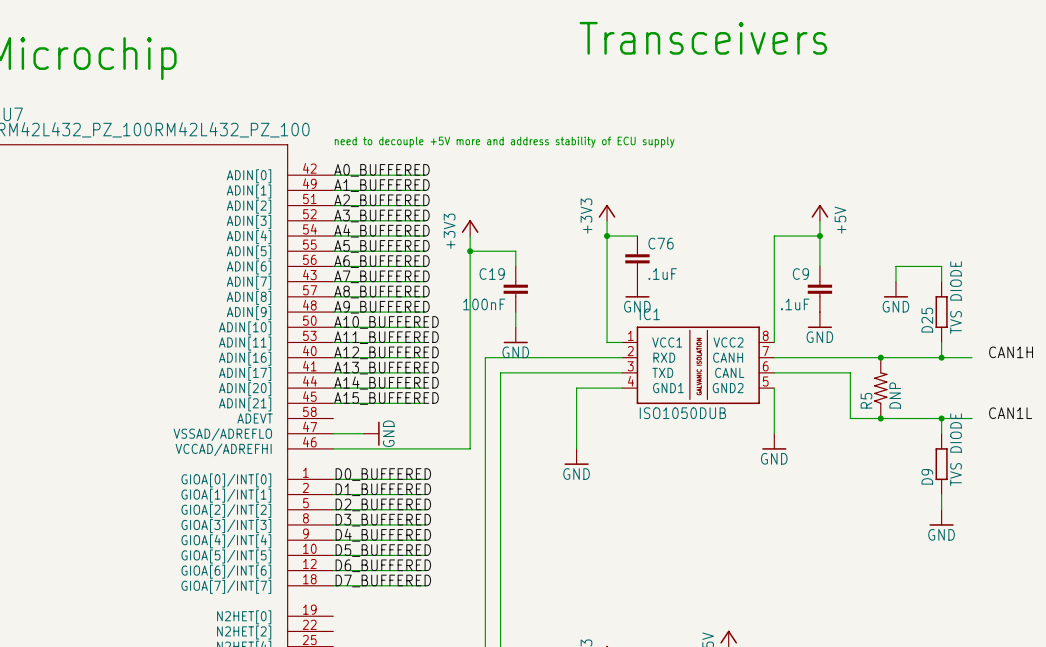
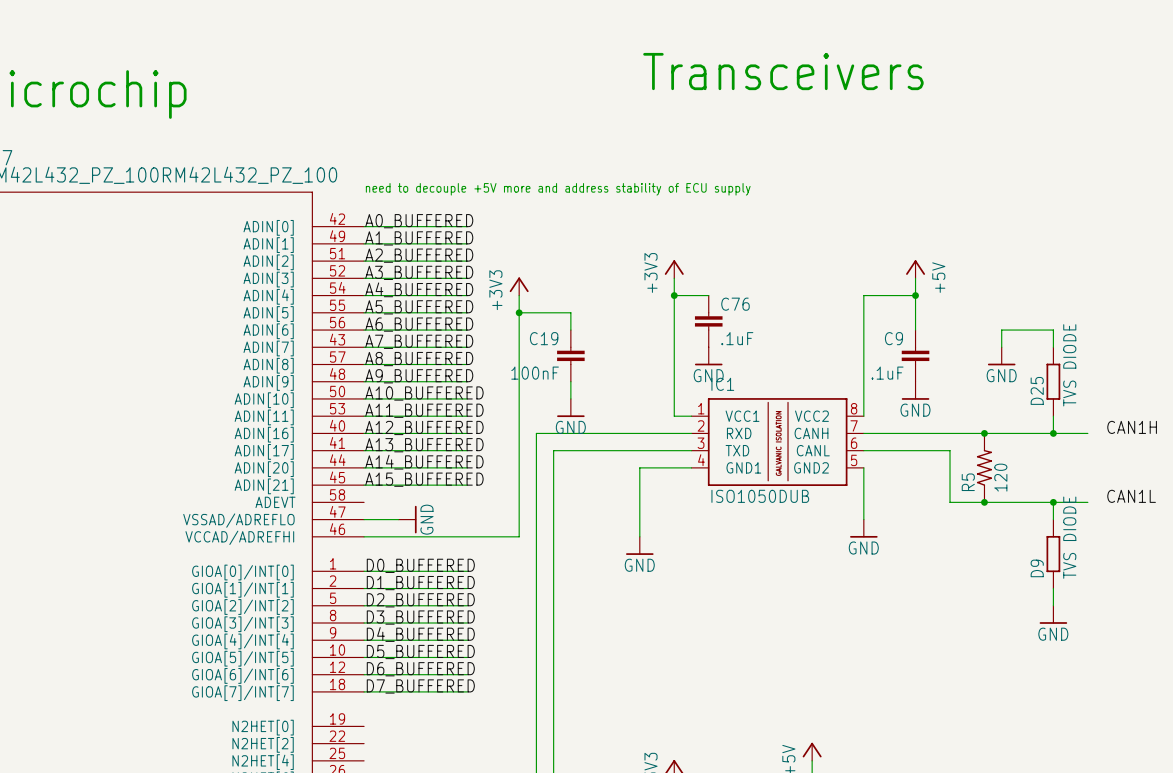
R5 value: DNP (895, 395) -> 120 (1000, 477)

